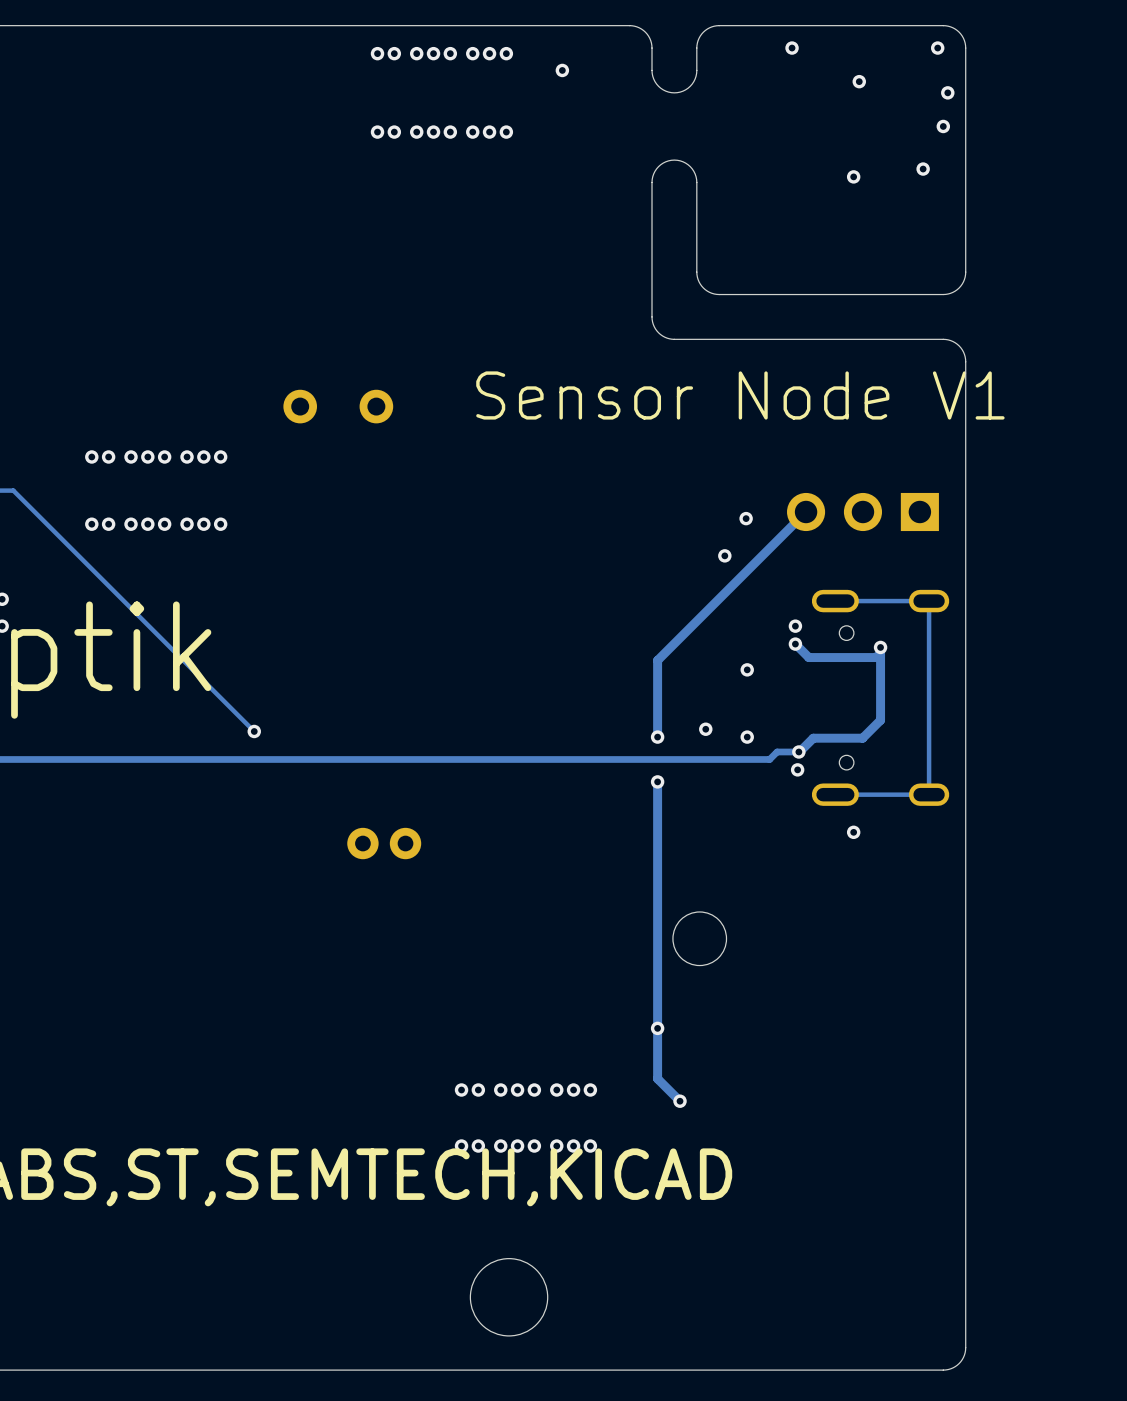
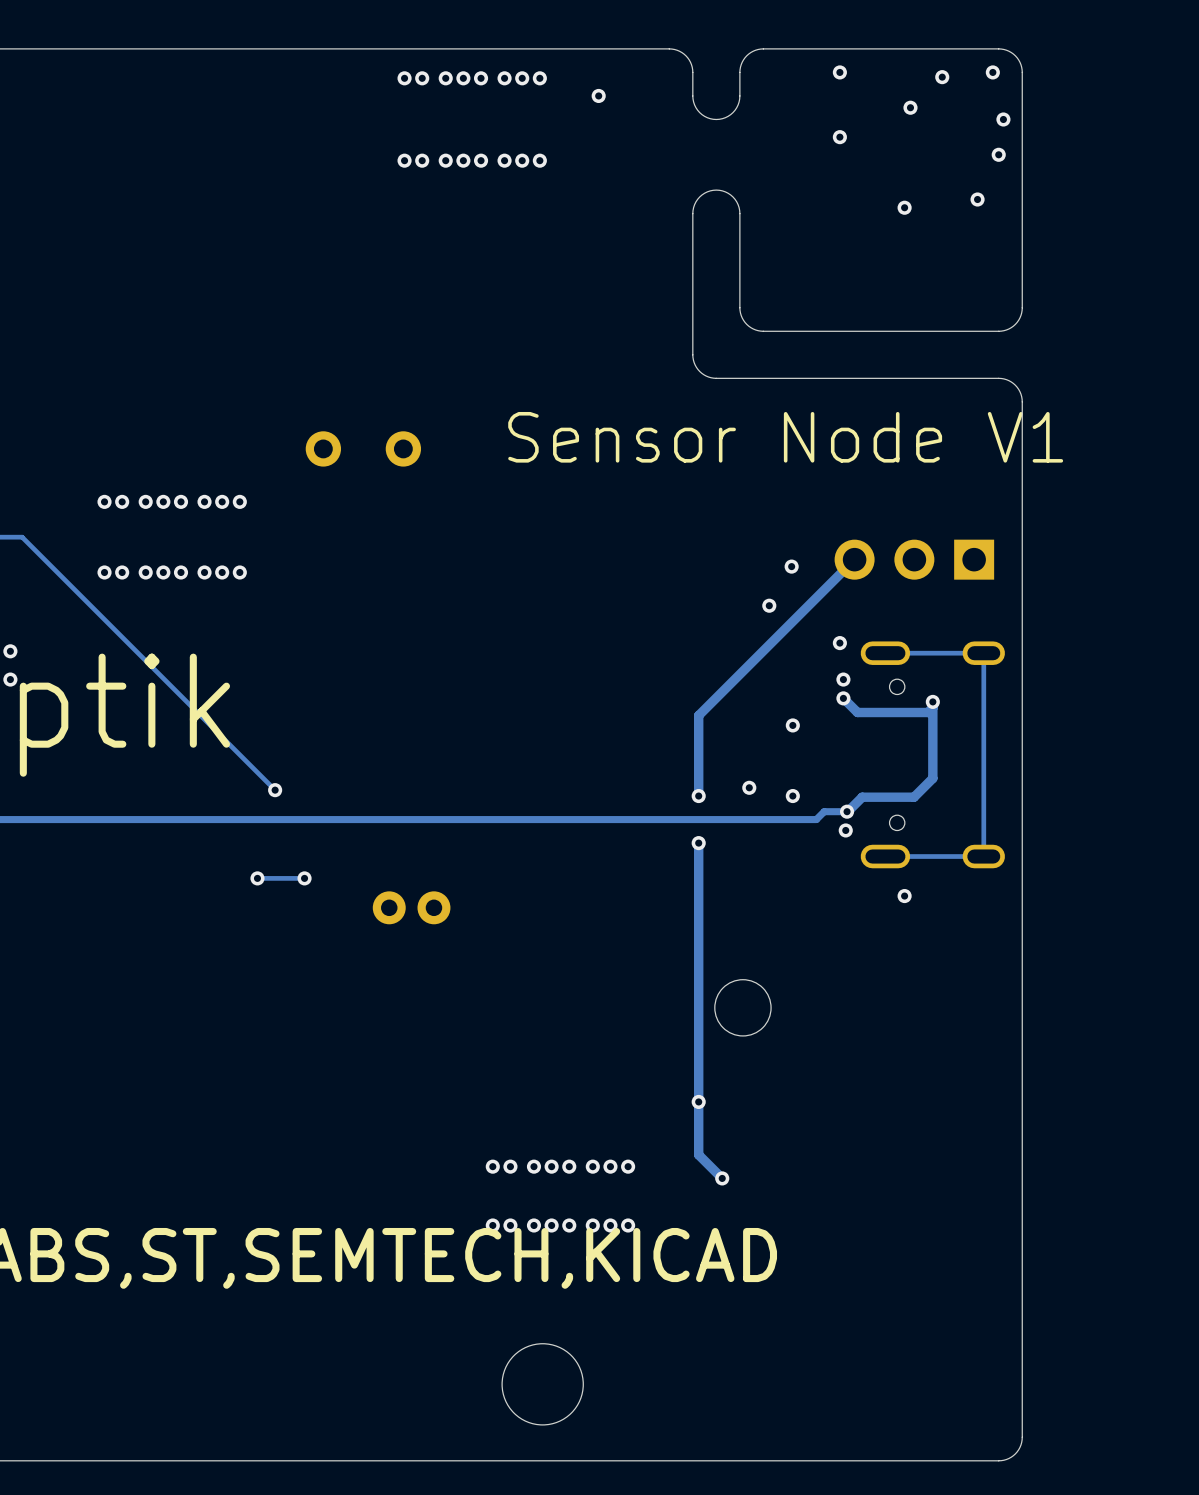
via: none -> (942, 77)
via: none -> (839, 137)
via: none -> (839, 643)
via: none -> (257, 878)
track: none -> (304, 878) (257, 878)
via: none -> (304, 878)

